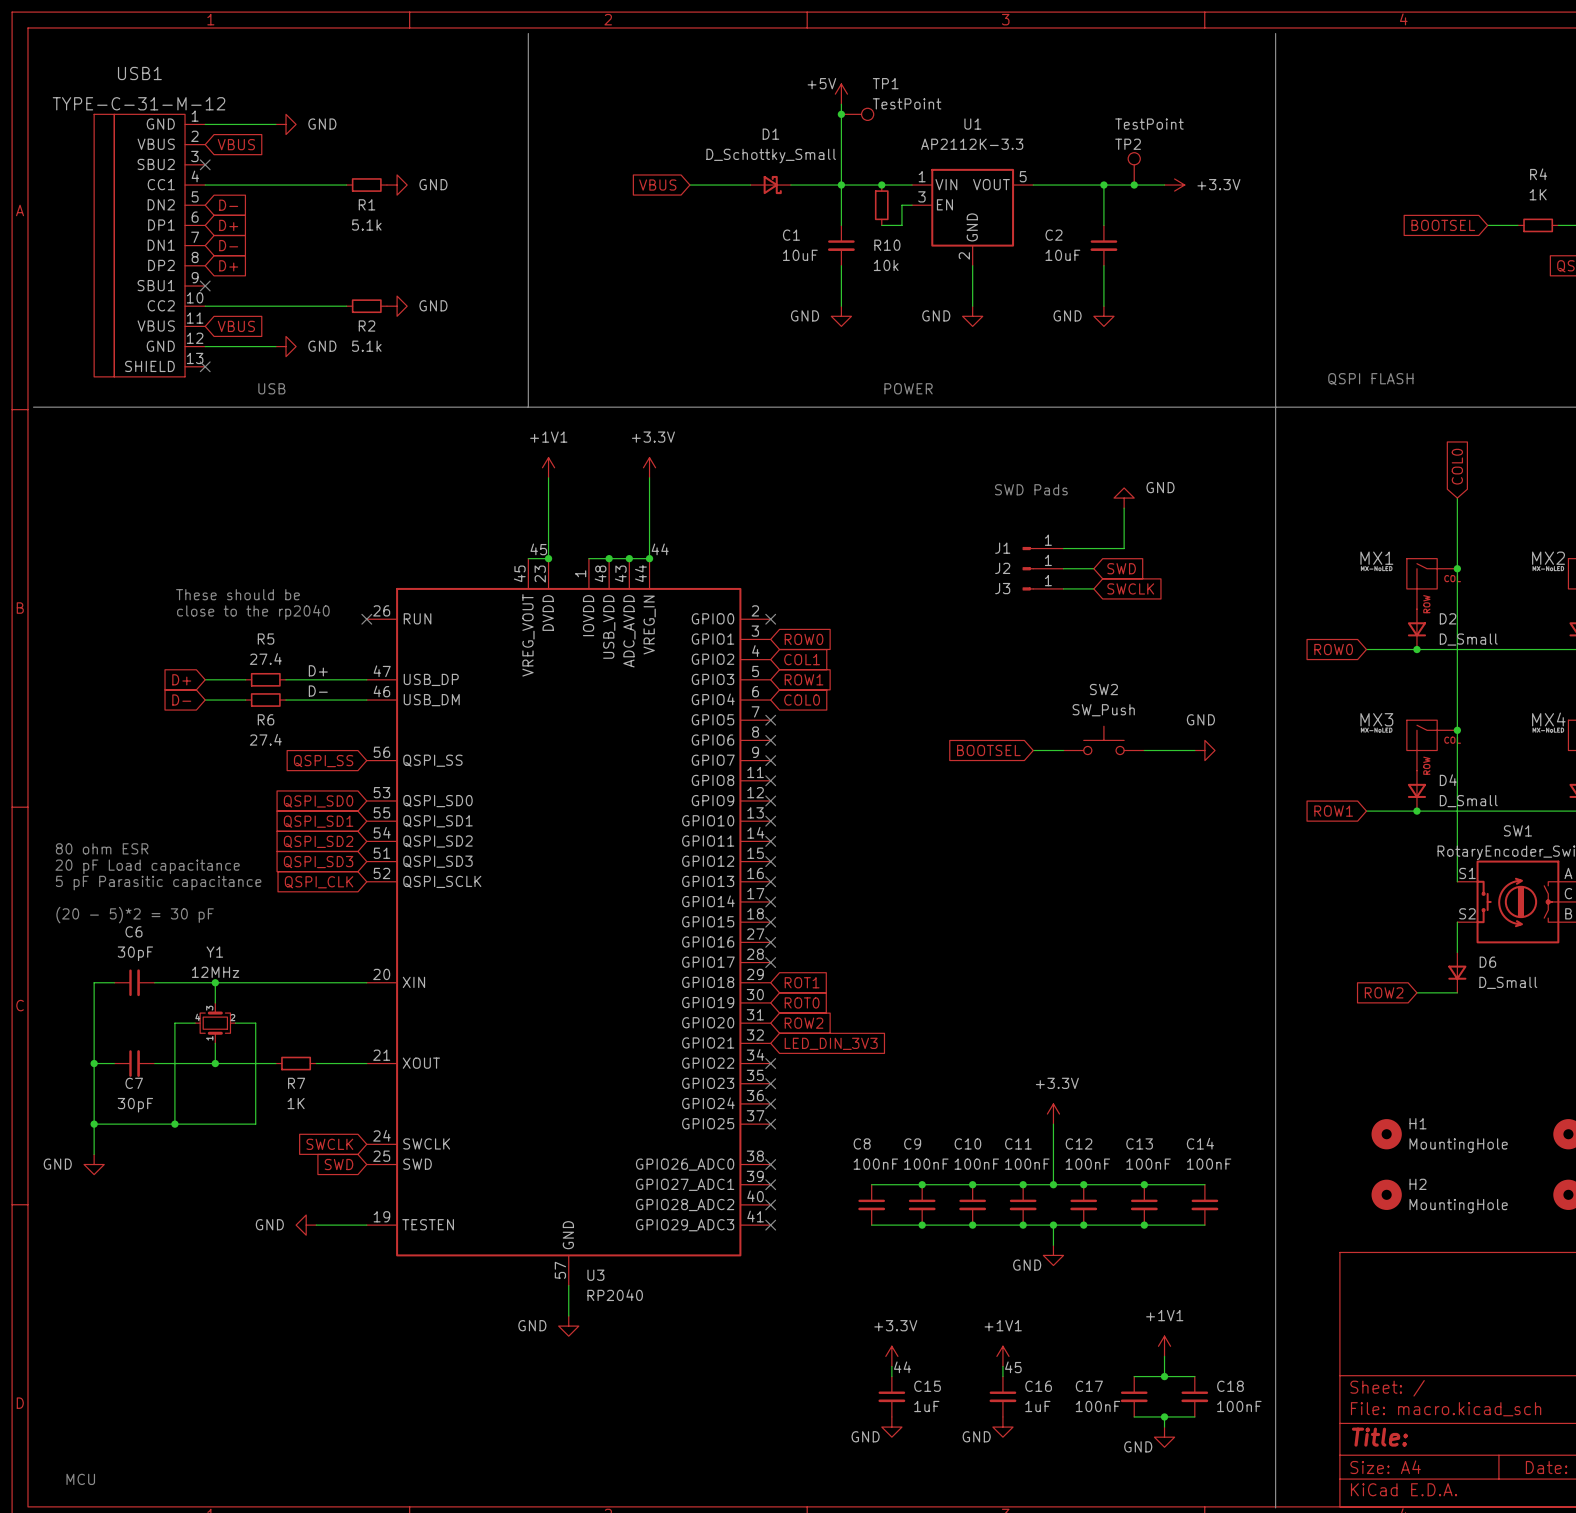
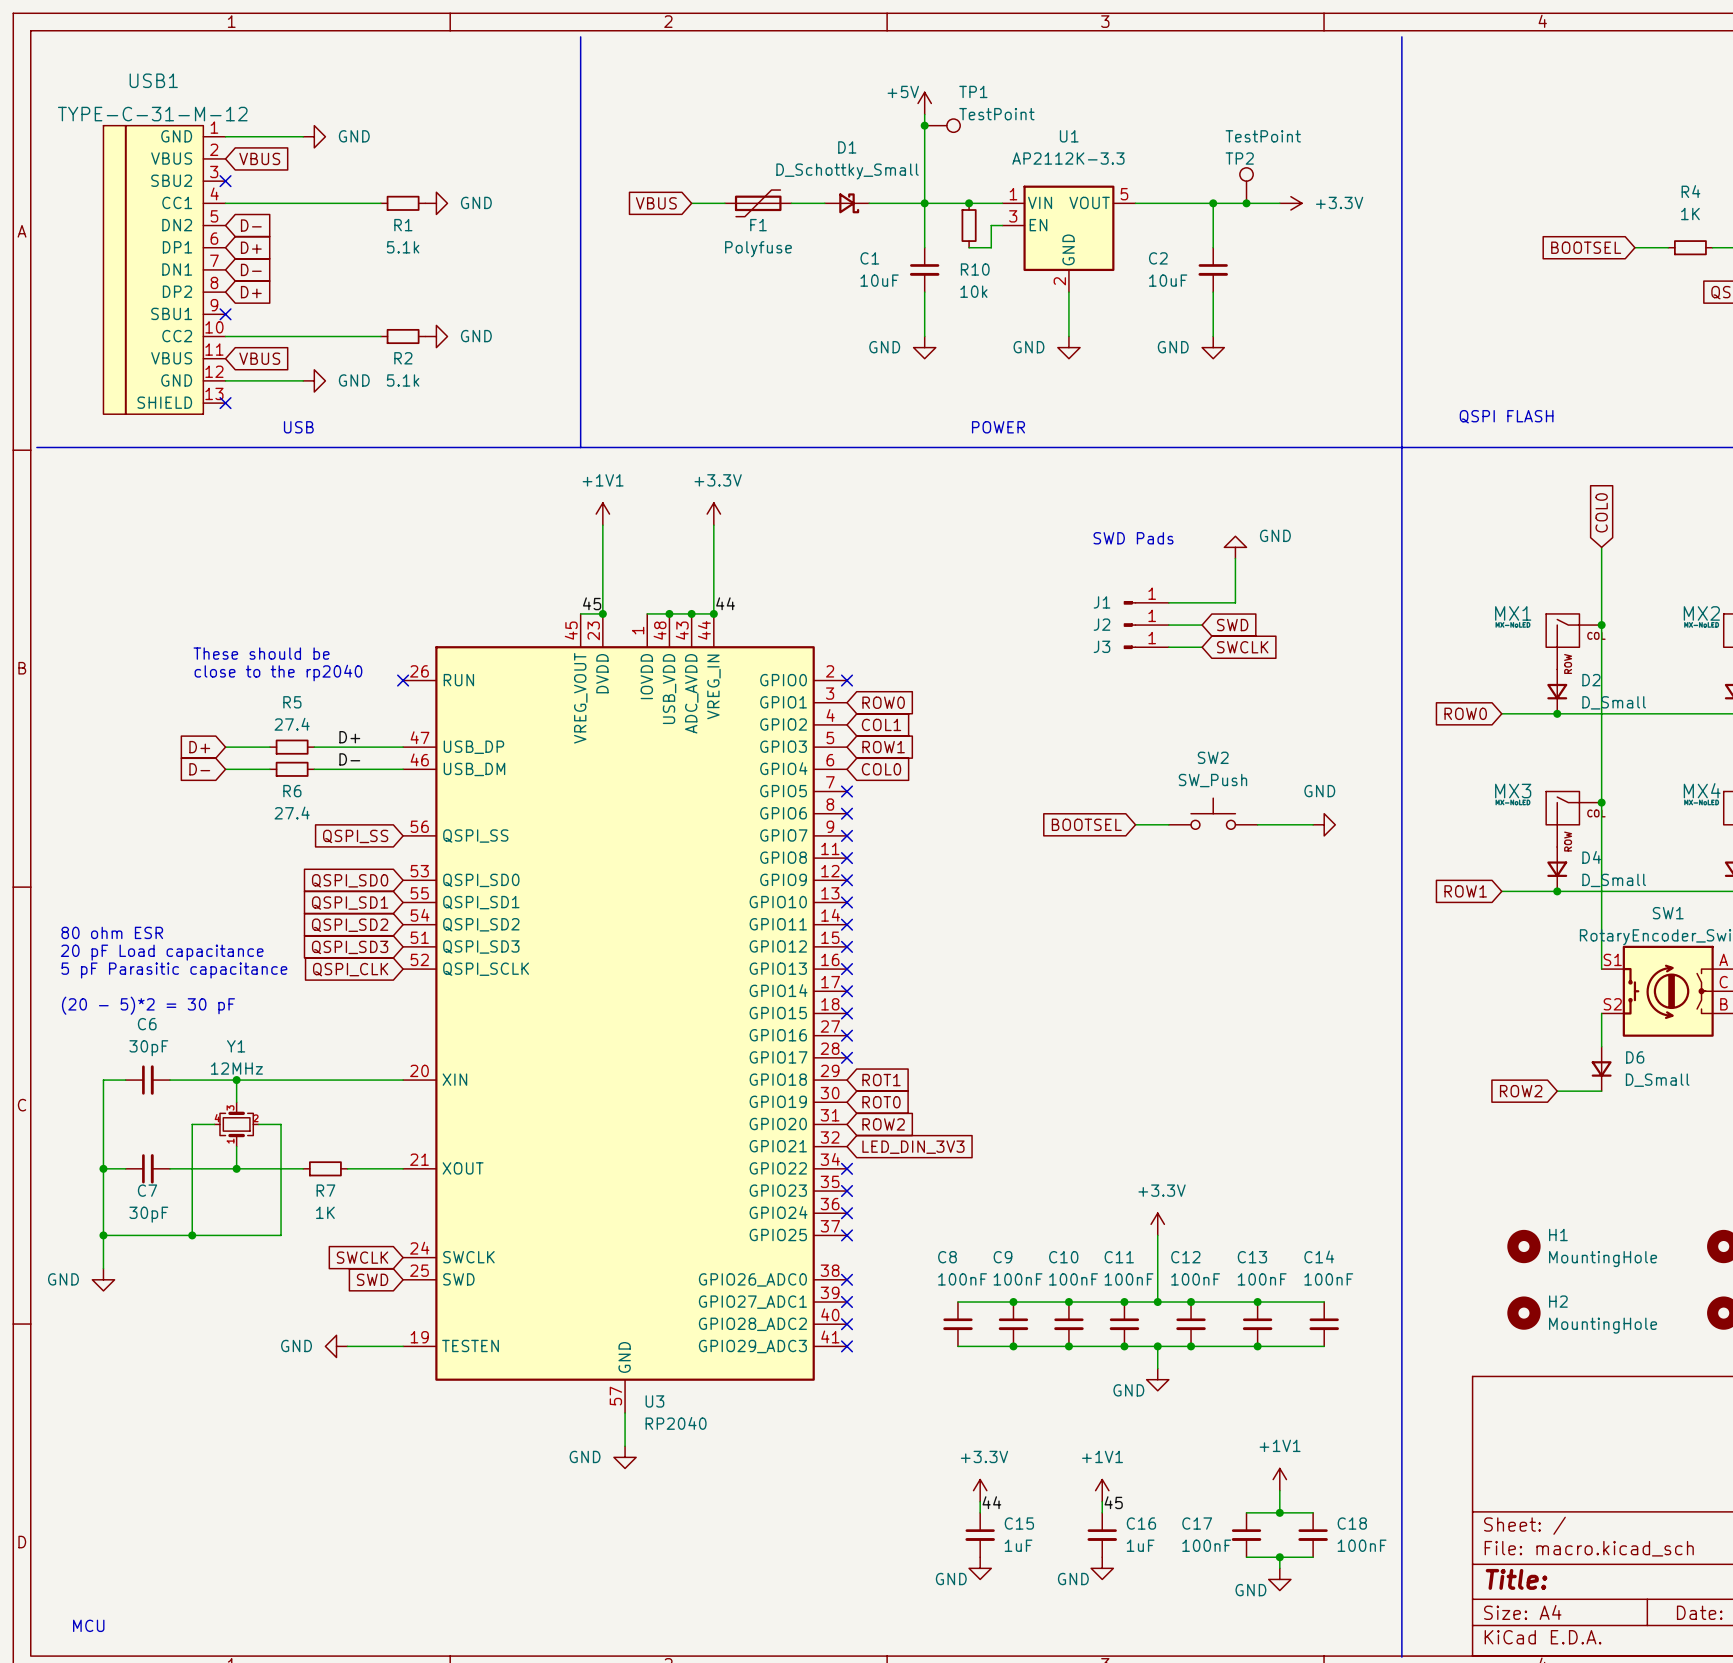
global label position: VBUS (657, 185) -> VBUS (656, 203)
F1: none -> Polyfuse (758, 203)

